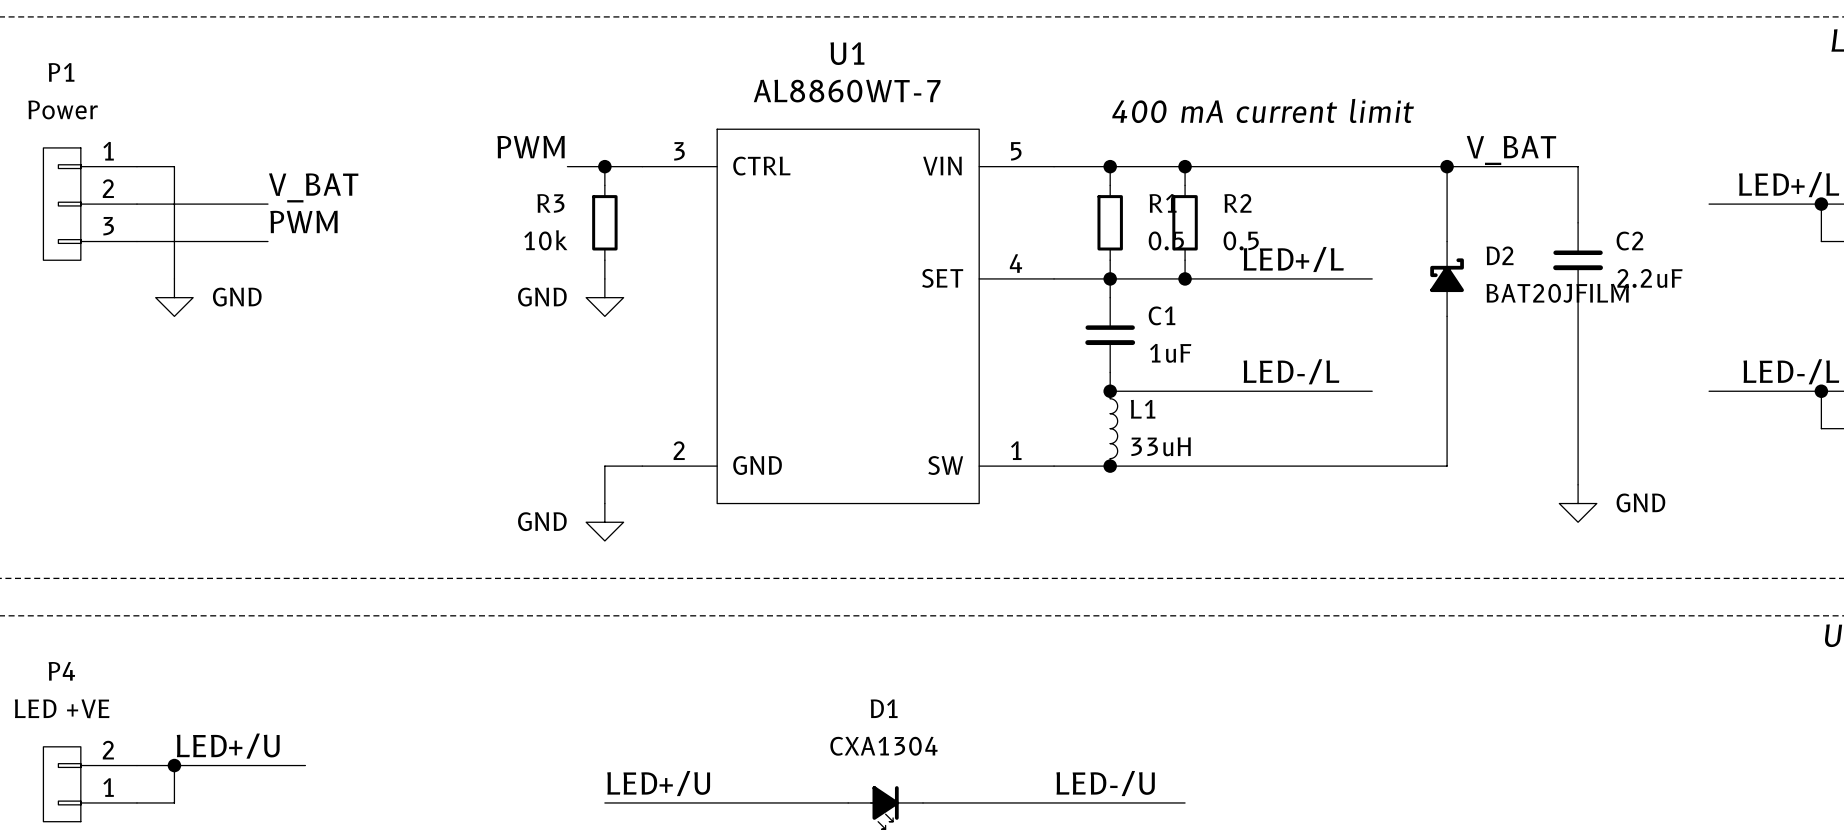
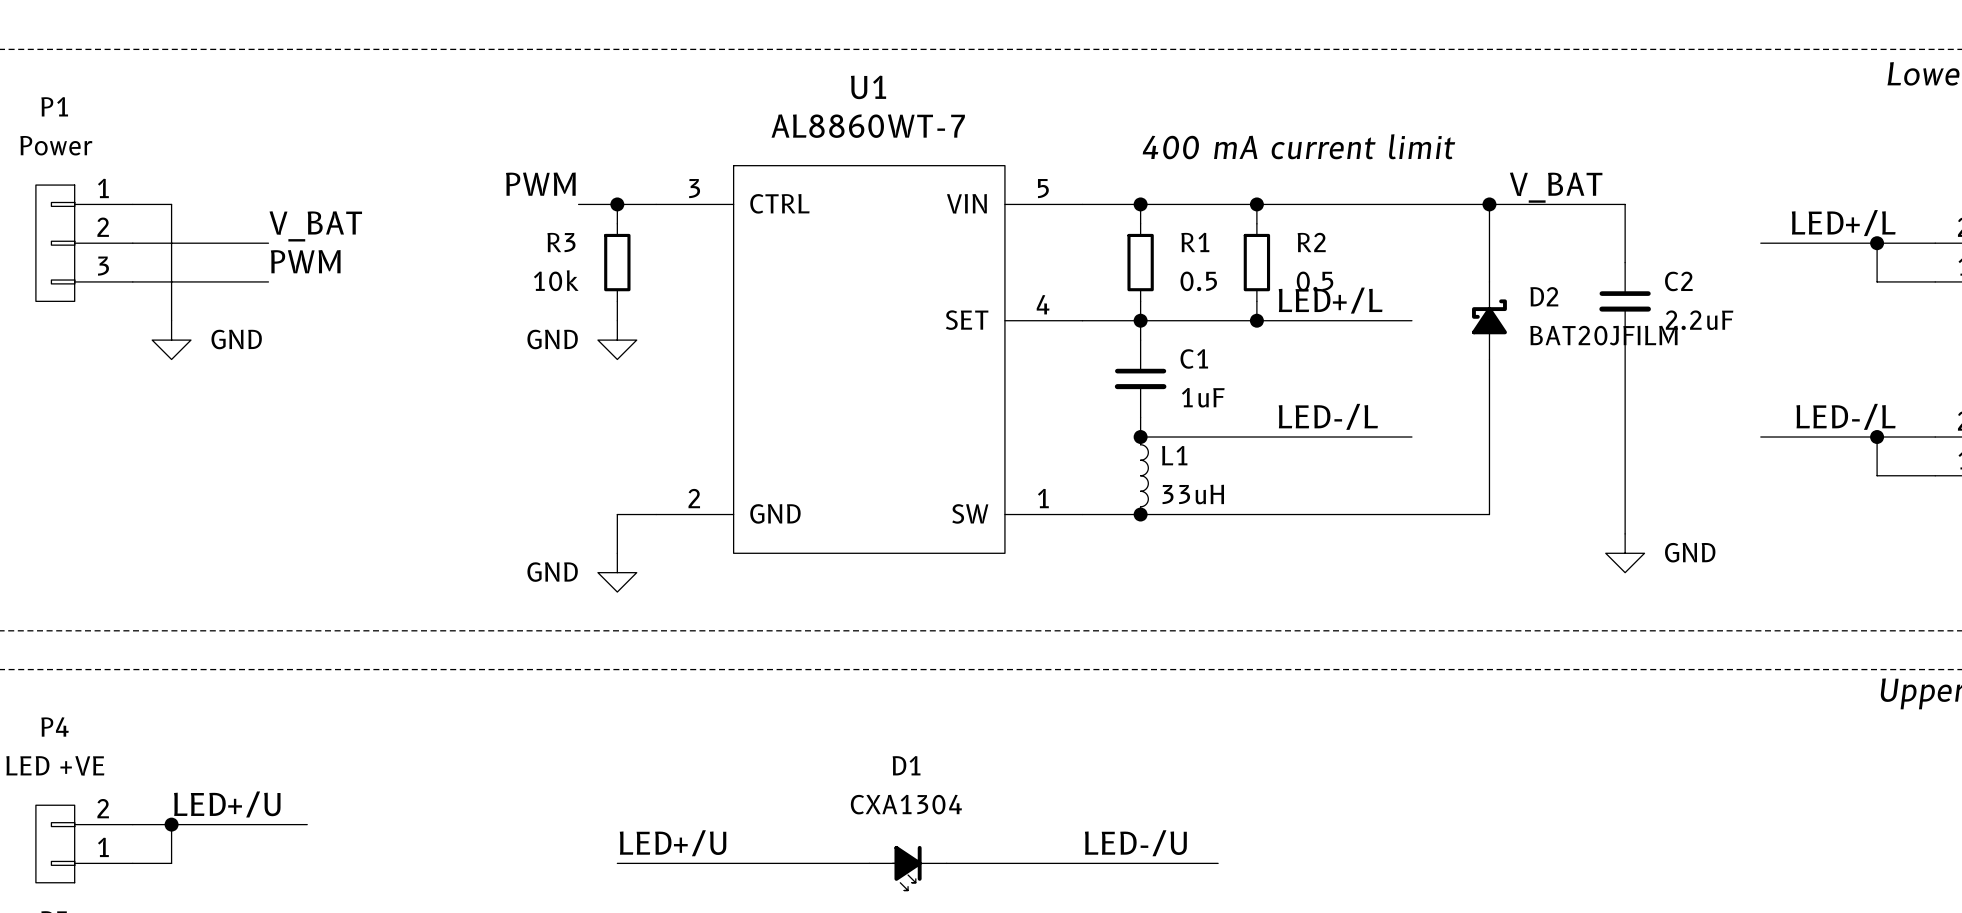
wire: (1185, 166) (1185, 185) -> (1256, 204) (1256, 223)
junction position: (1185, 166) -> (1256, 204)
R2 position: (1185, 222) -> (1256, 262)
wire: (1185, 260) (1185, 278) -> (1256, 301) (1256, 320)
junction position: (1185, 278) -> (1256, 320)

